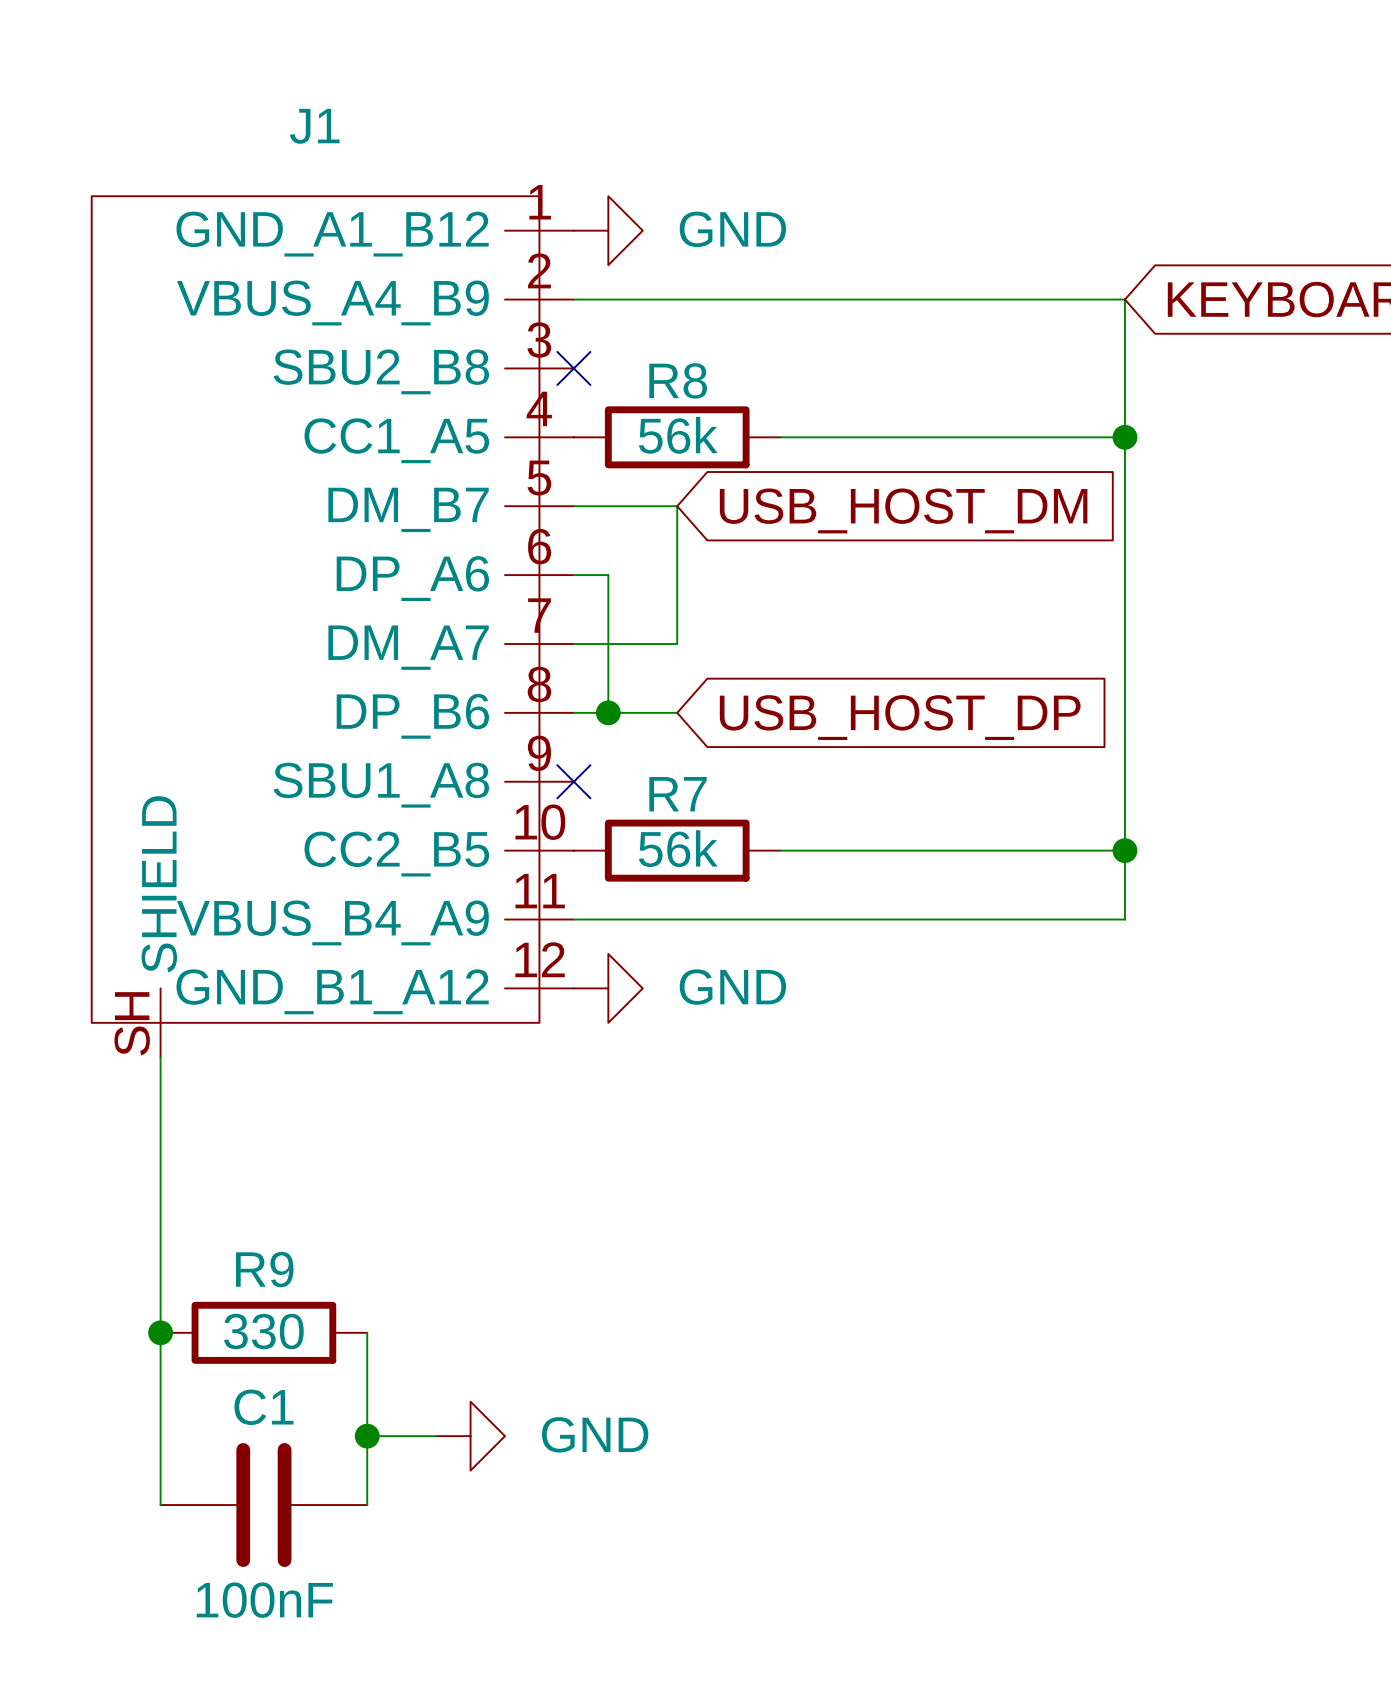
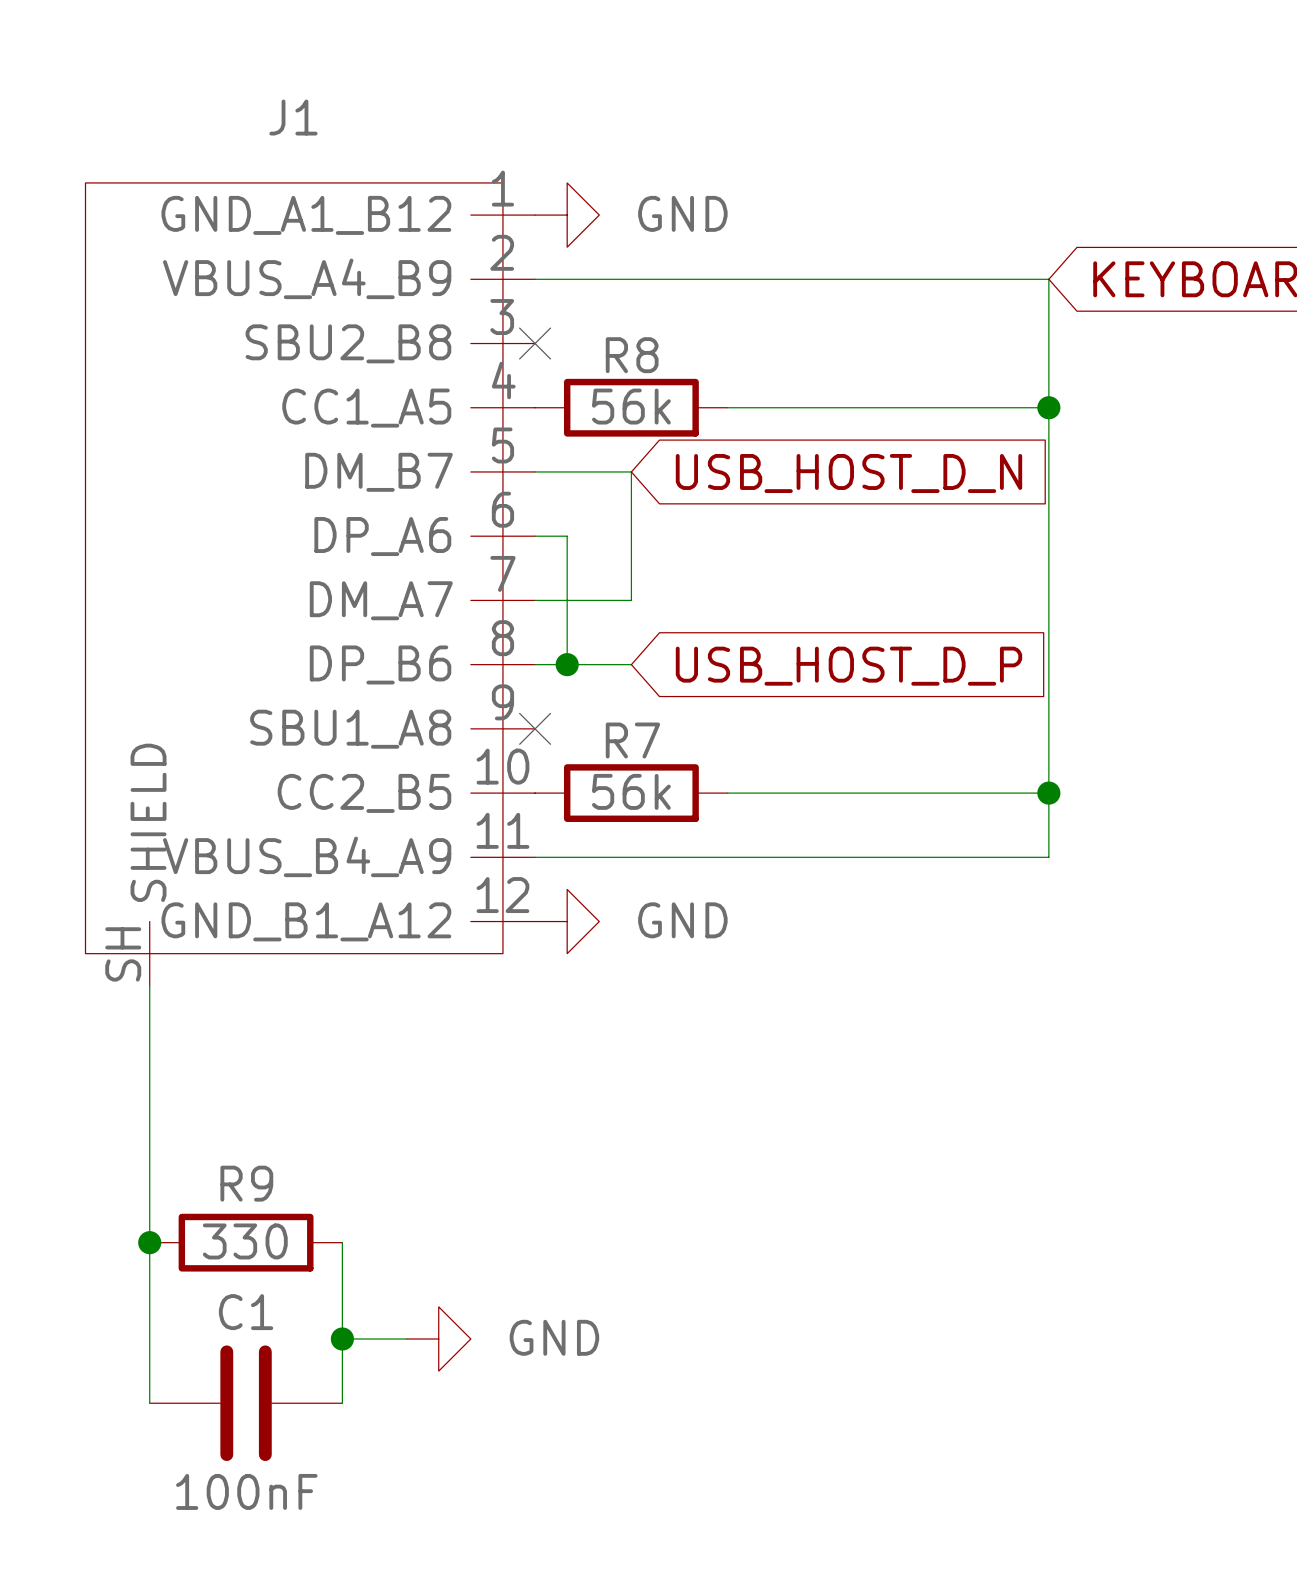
global label: USB_HOST_DM (903, 510) -> USB_HOST_D_N (848, 473)
global label: USB_HOST_DP (900, 717) -> USB_HOST_D_P (848, 666)

